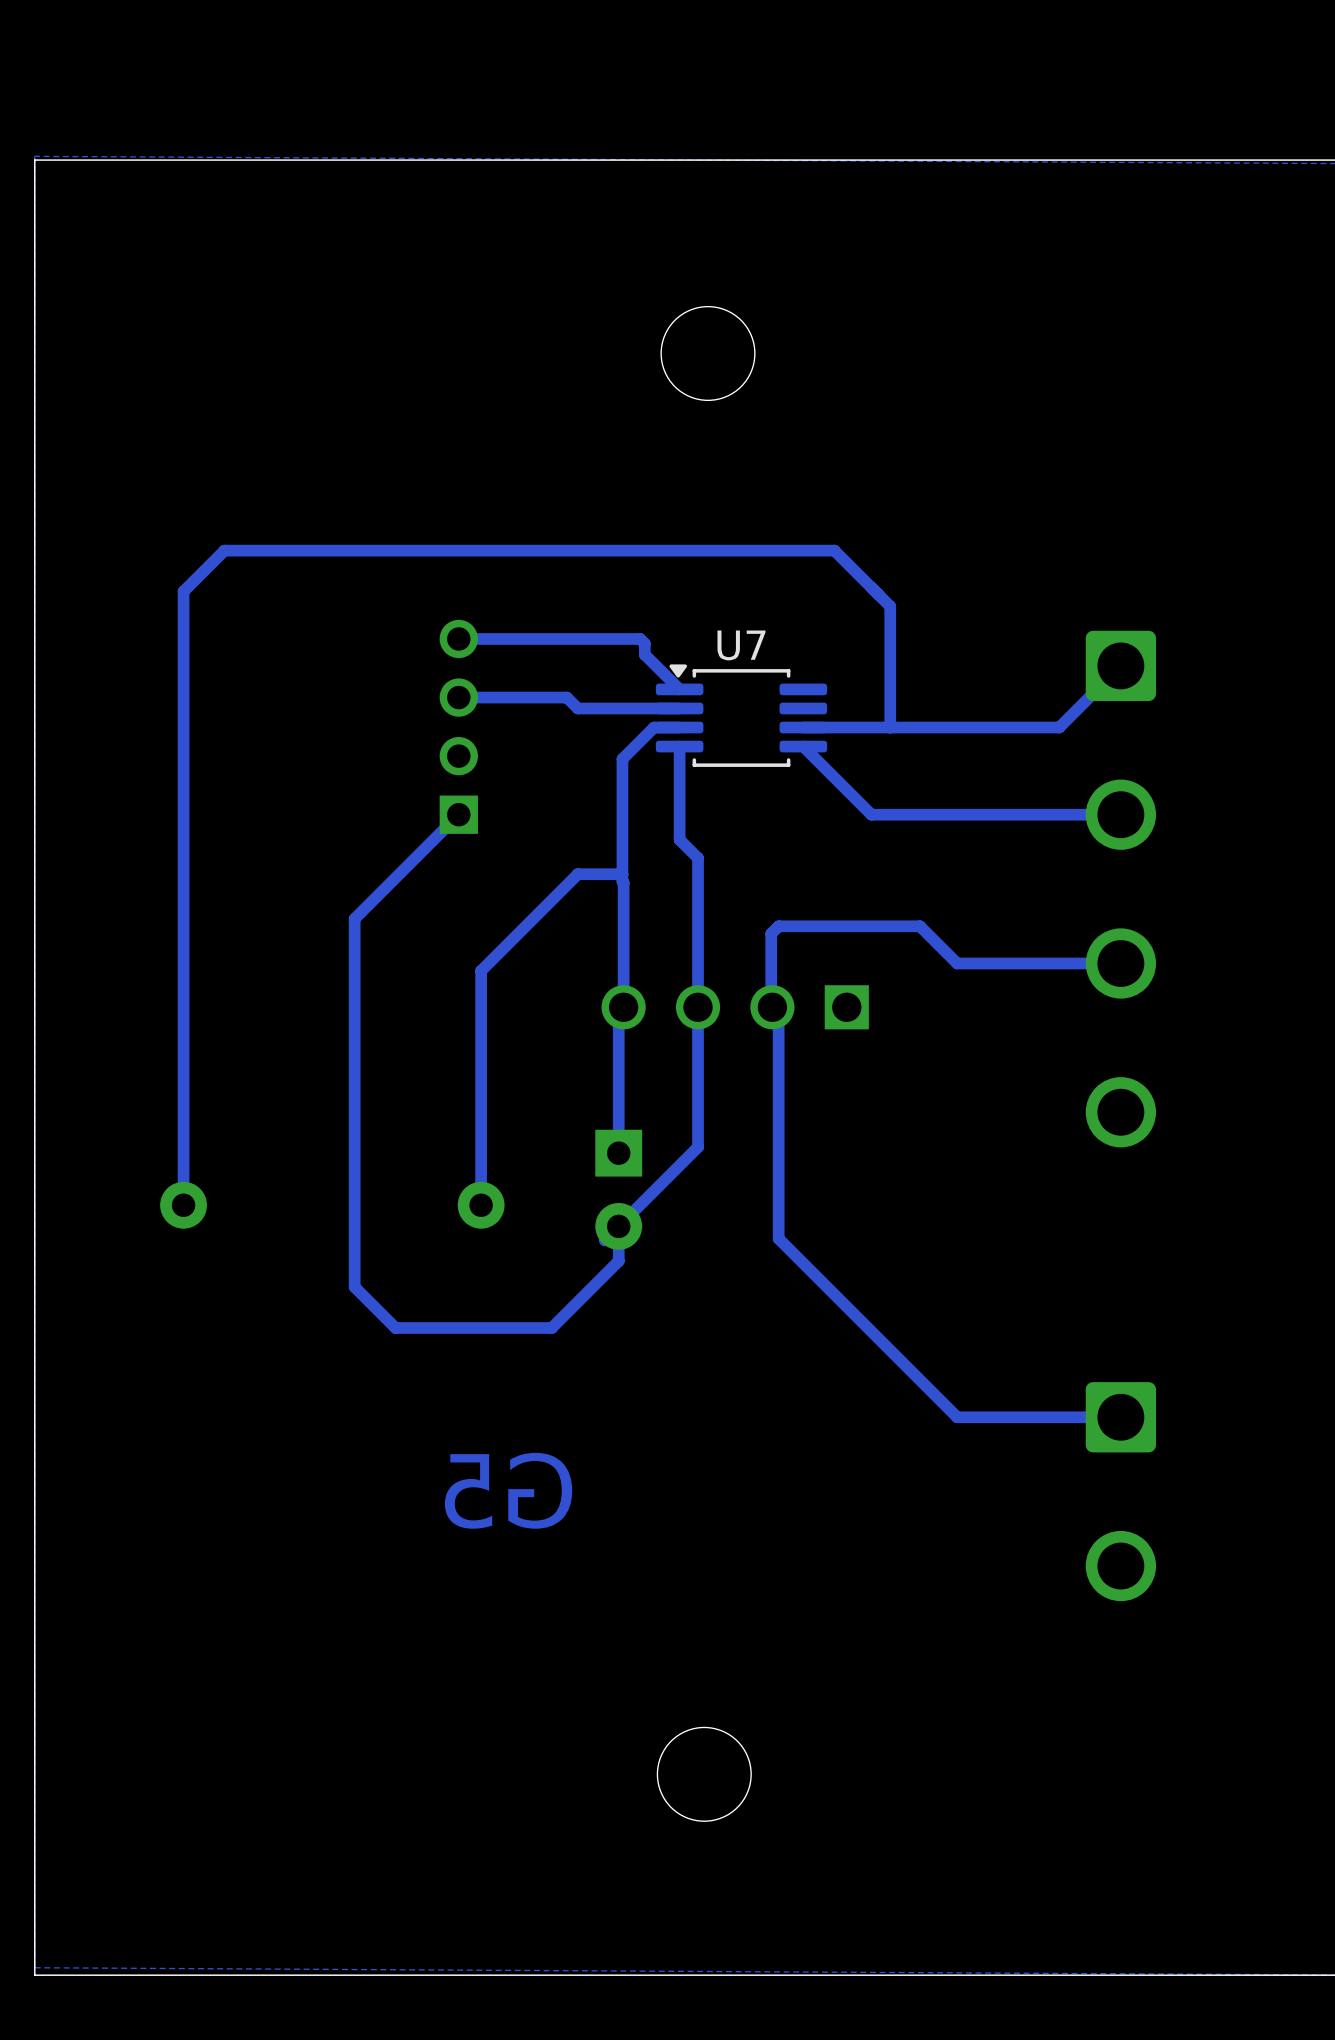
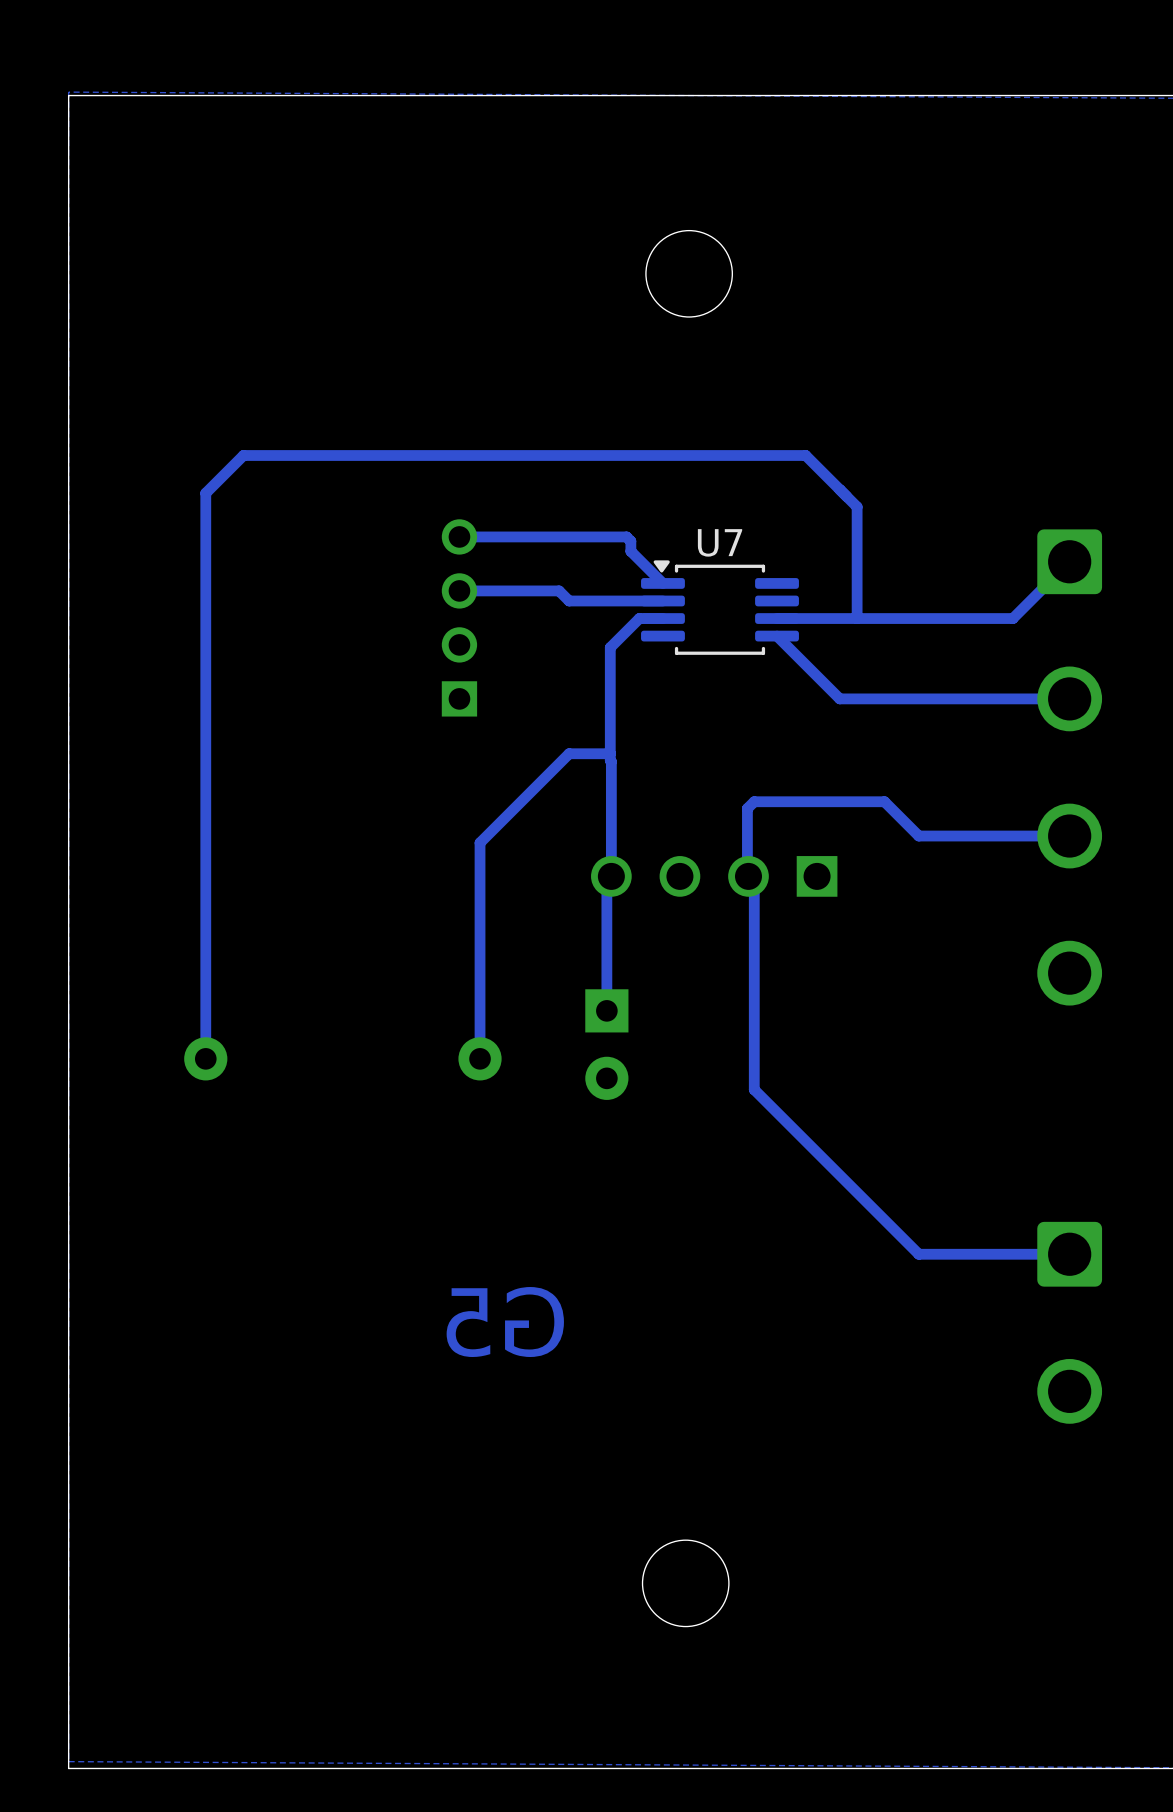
bottom track: (679, 746) (679, 839) (698, 858) (698, 1147) (604, 1240) -> none
bottom track: (458, 814) (354, 918) (354, 1287) (395, 1327) (551, 1327) (618, 1261) (618, 1226) -> none

